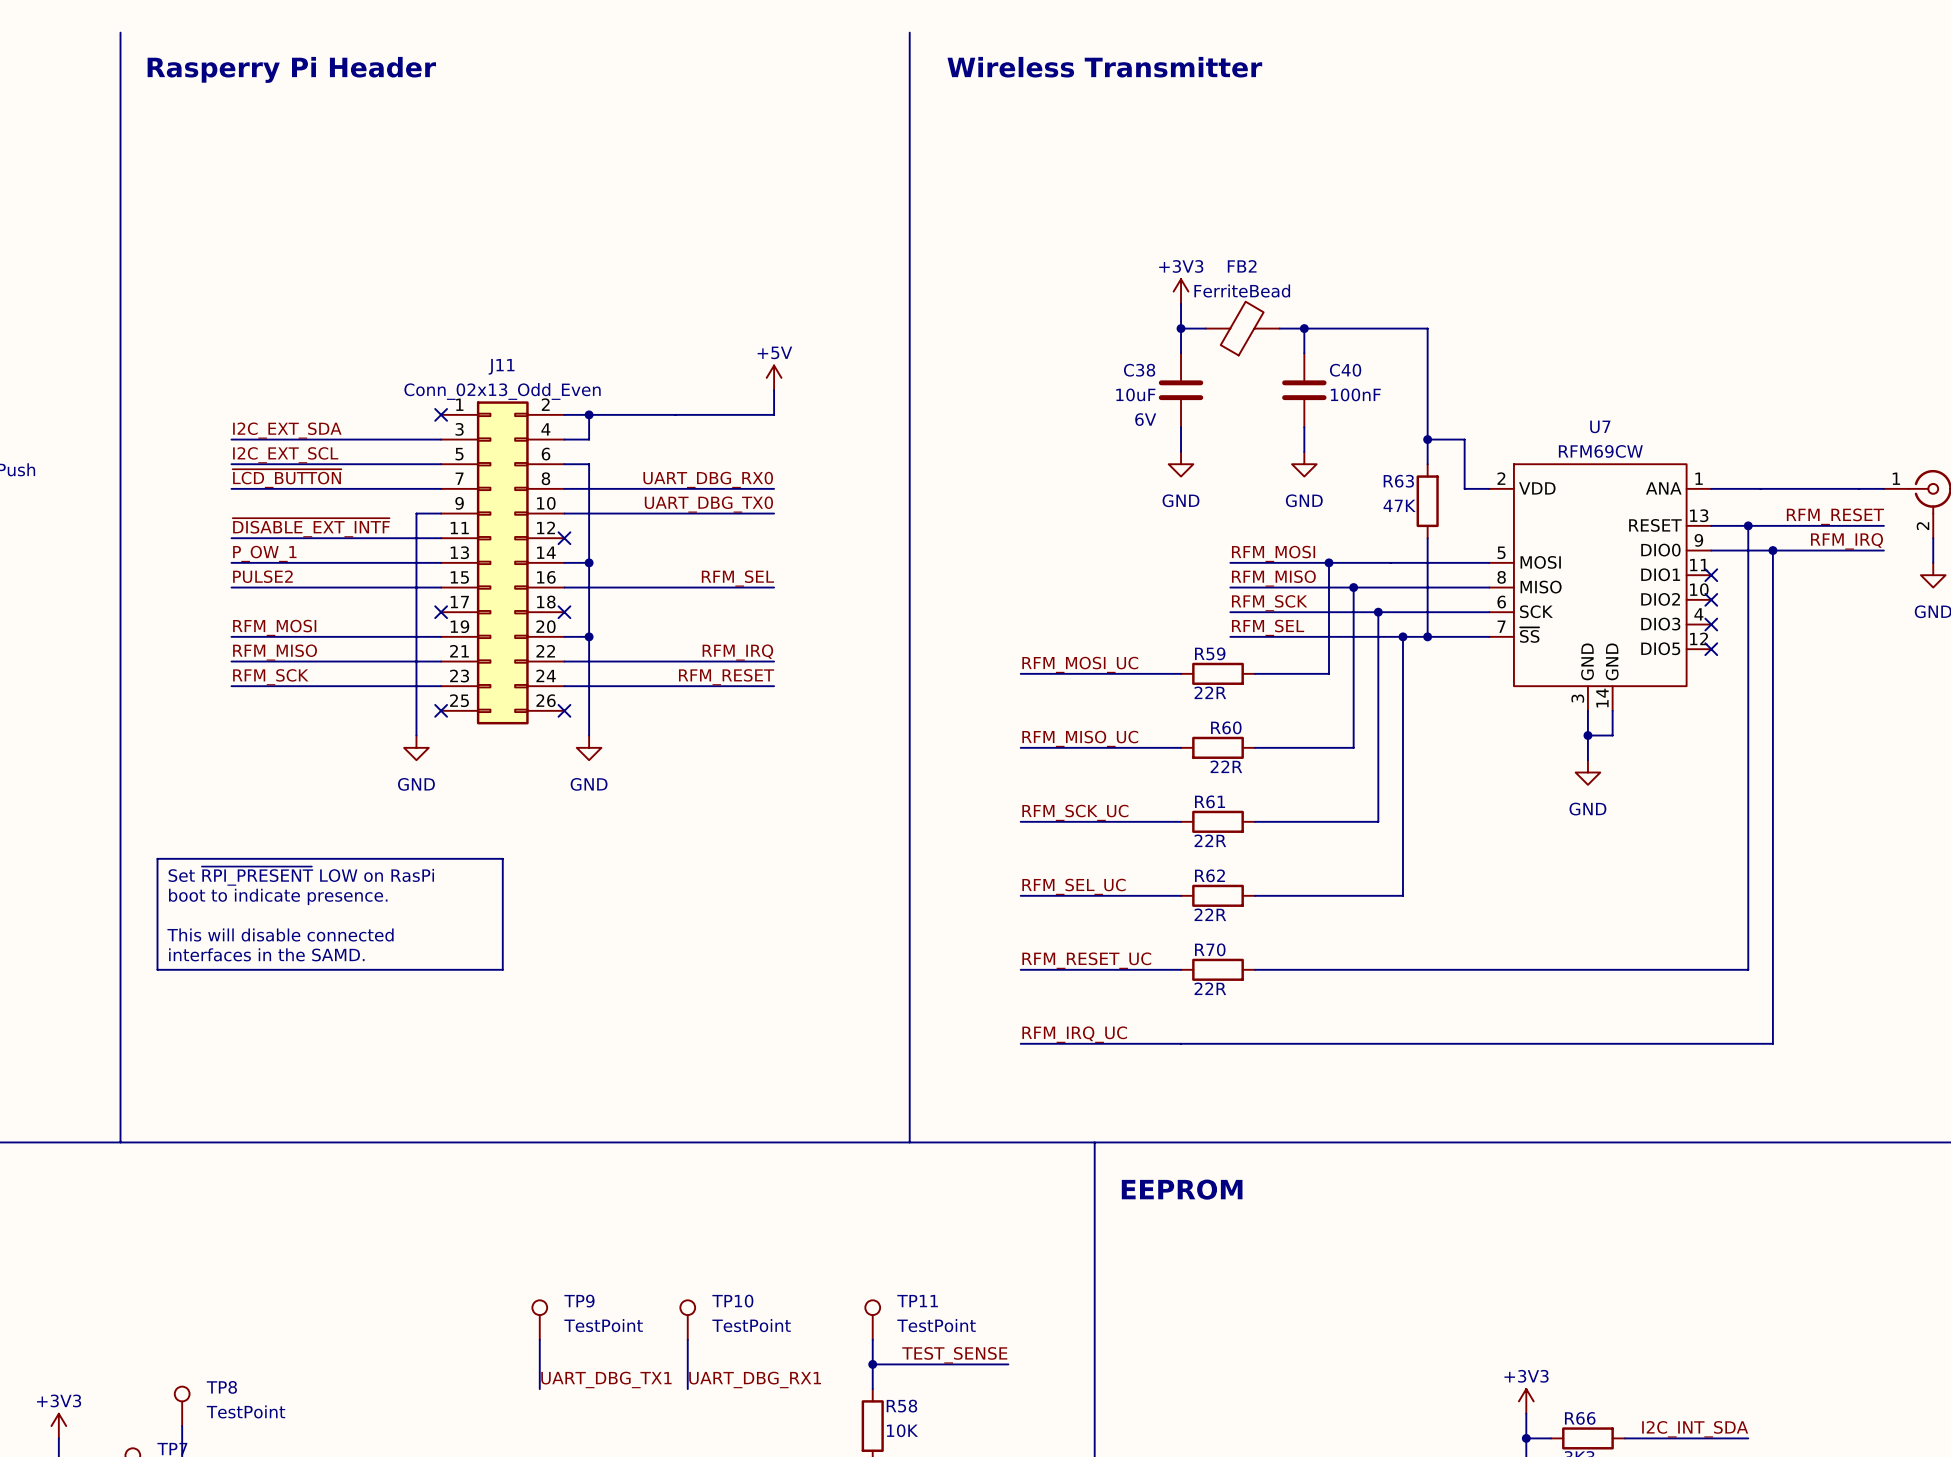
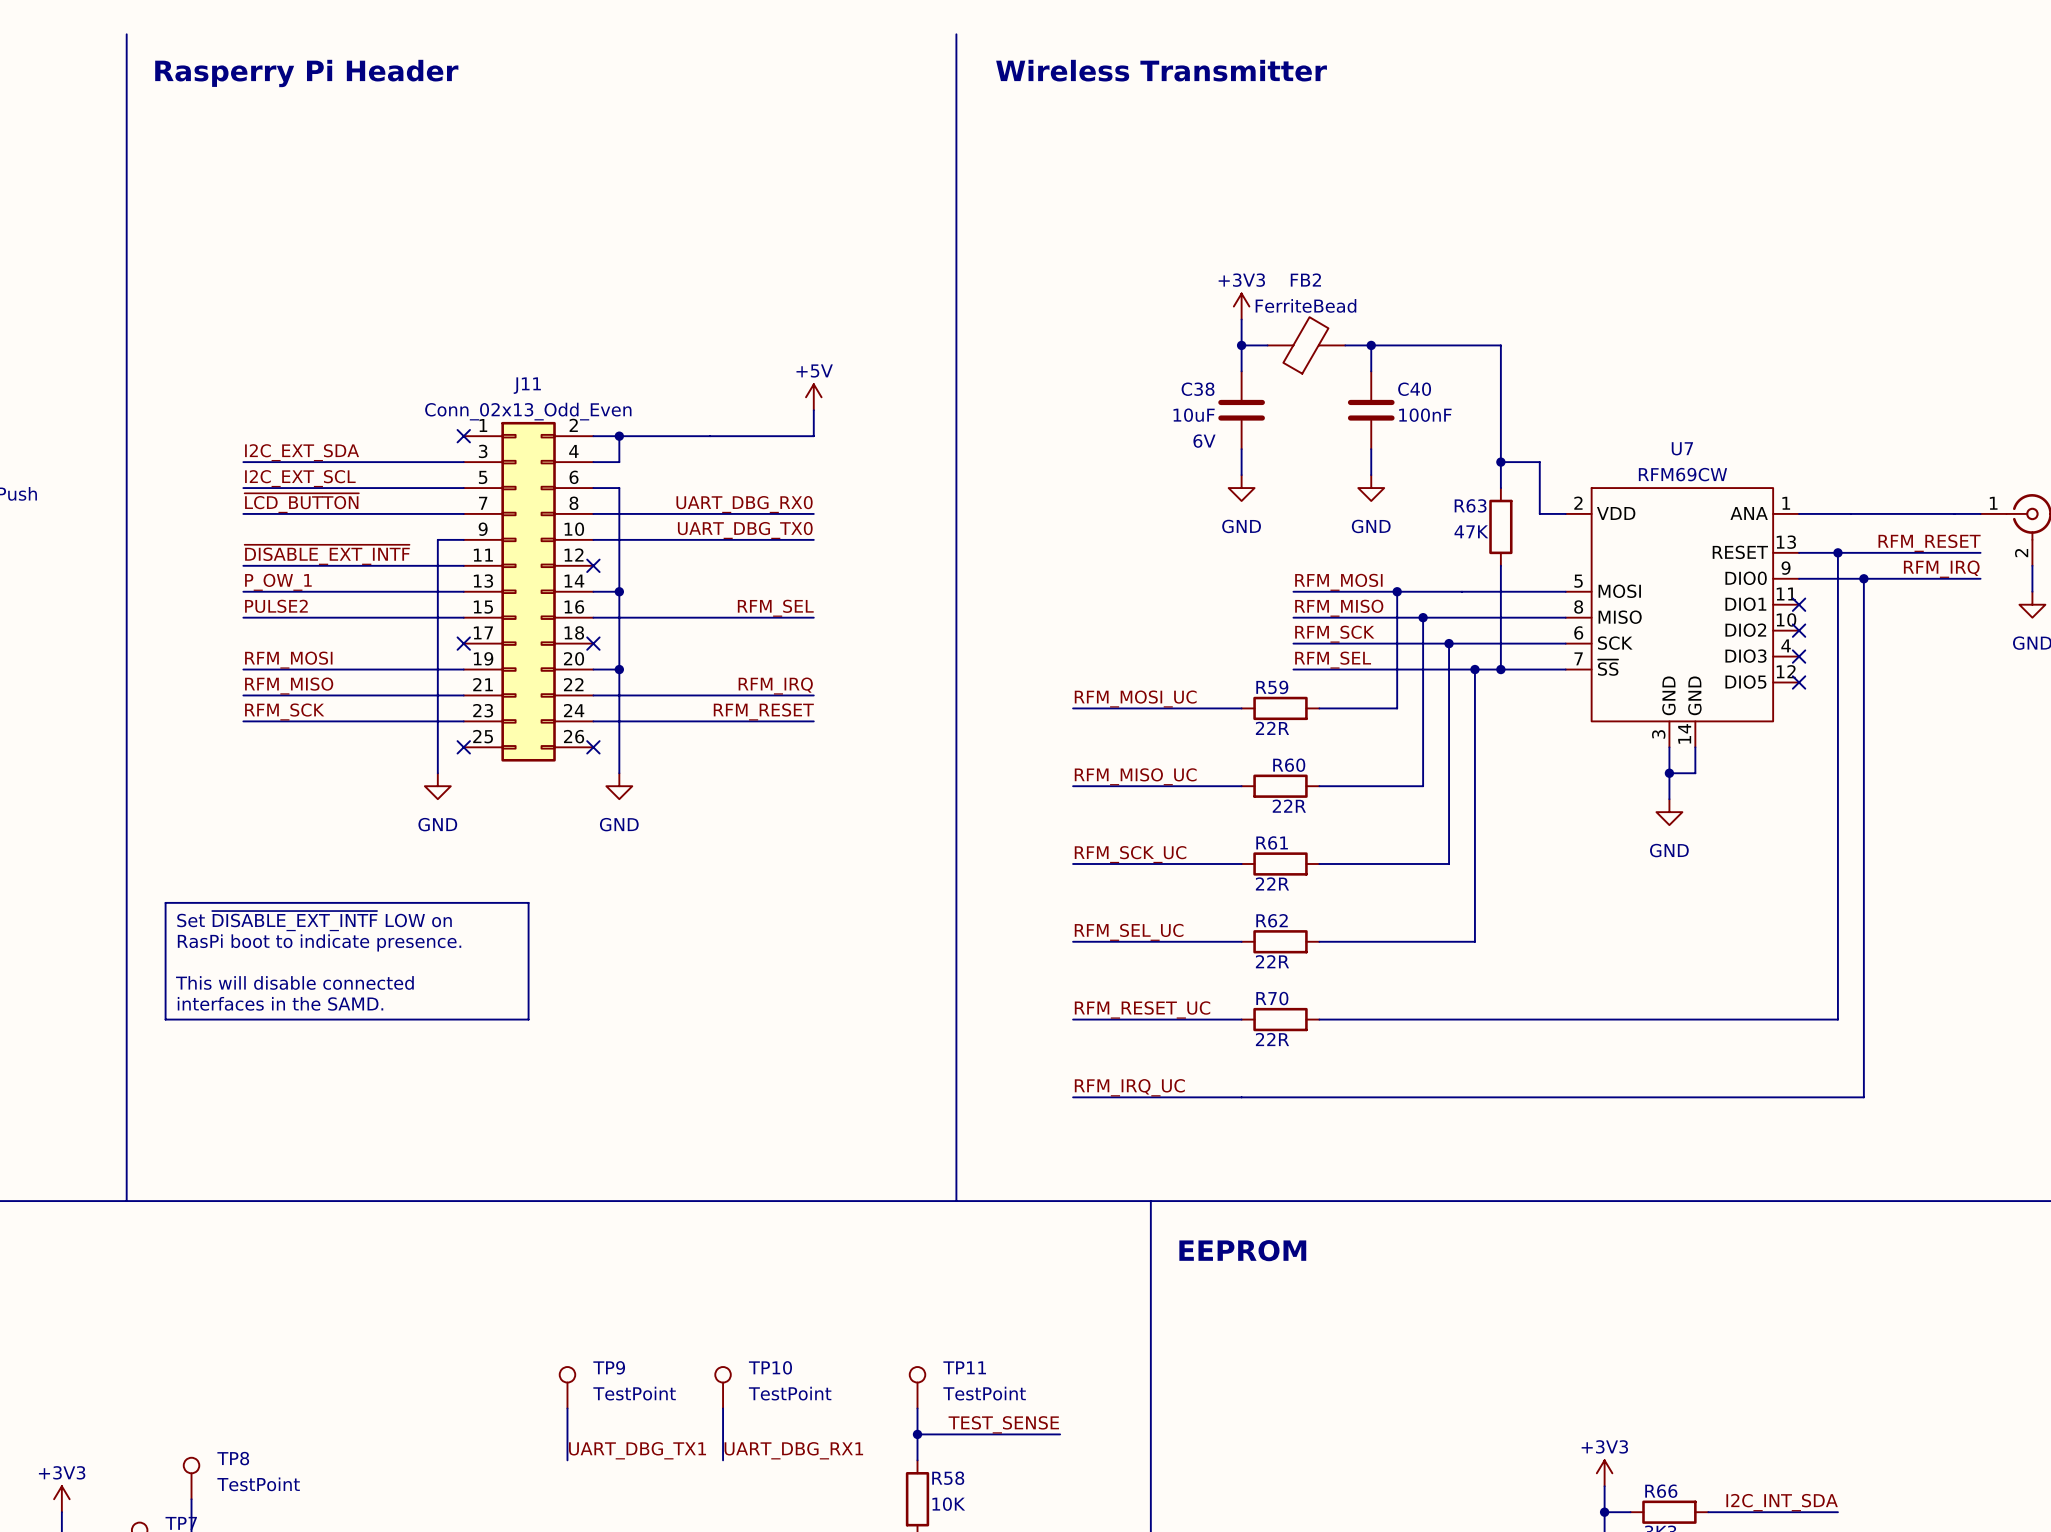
text: Set ~{RPI_PRESENT} LOW on RasPi (301, 876) -> Set ~{DISABLE_EXT_INTF} LOW on (314, 921)
text: boot to indicate presence. (278, 896) -> RasPi boot to indicate presence. (319, 942)

